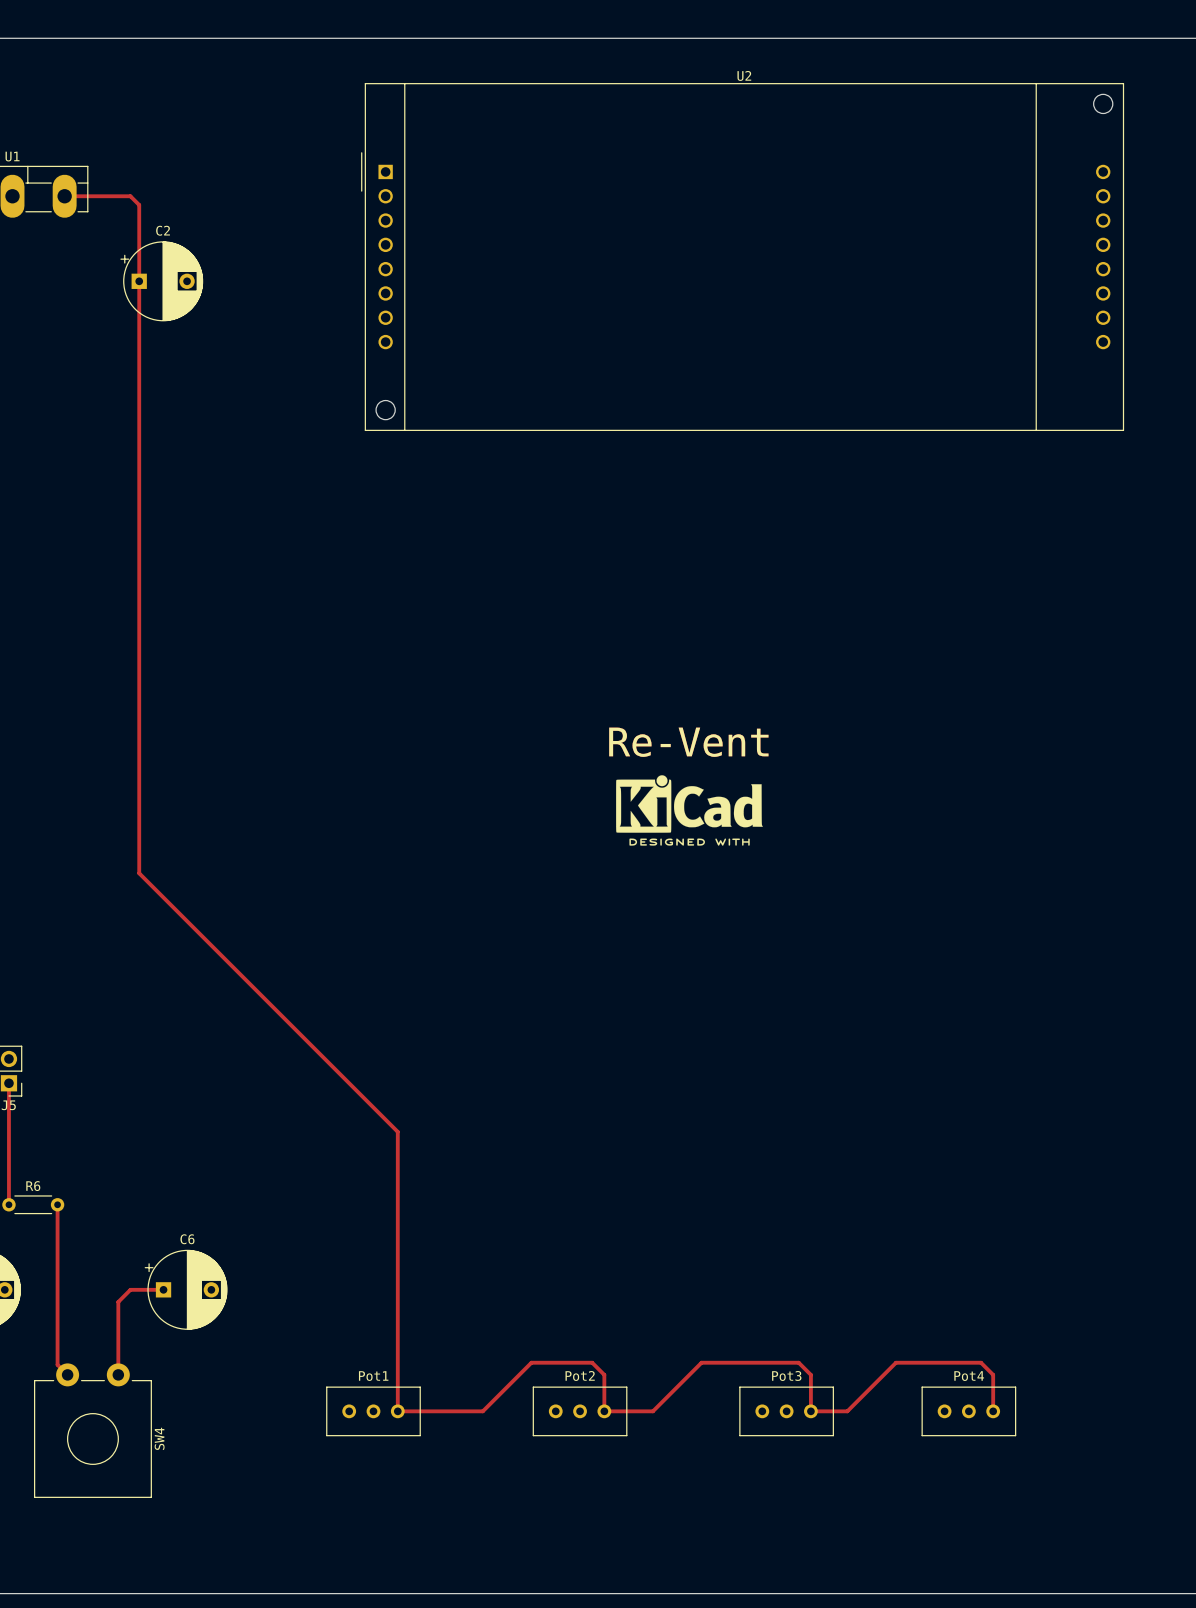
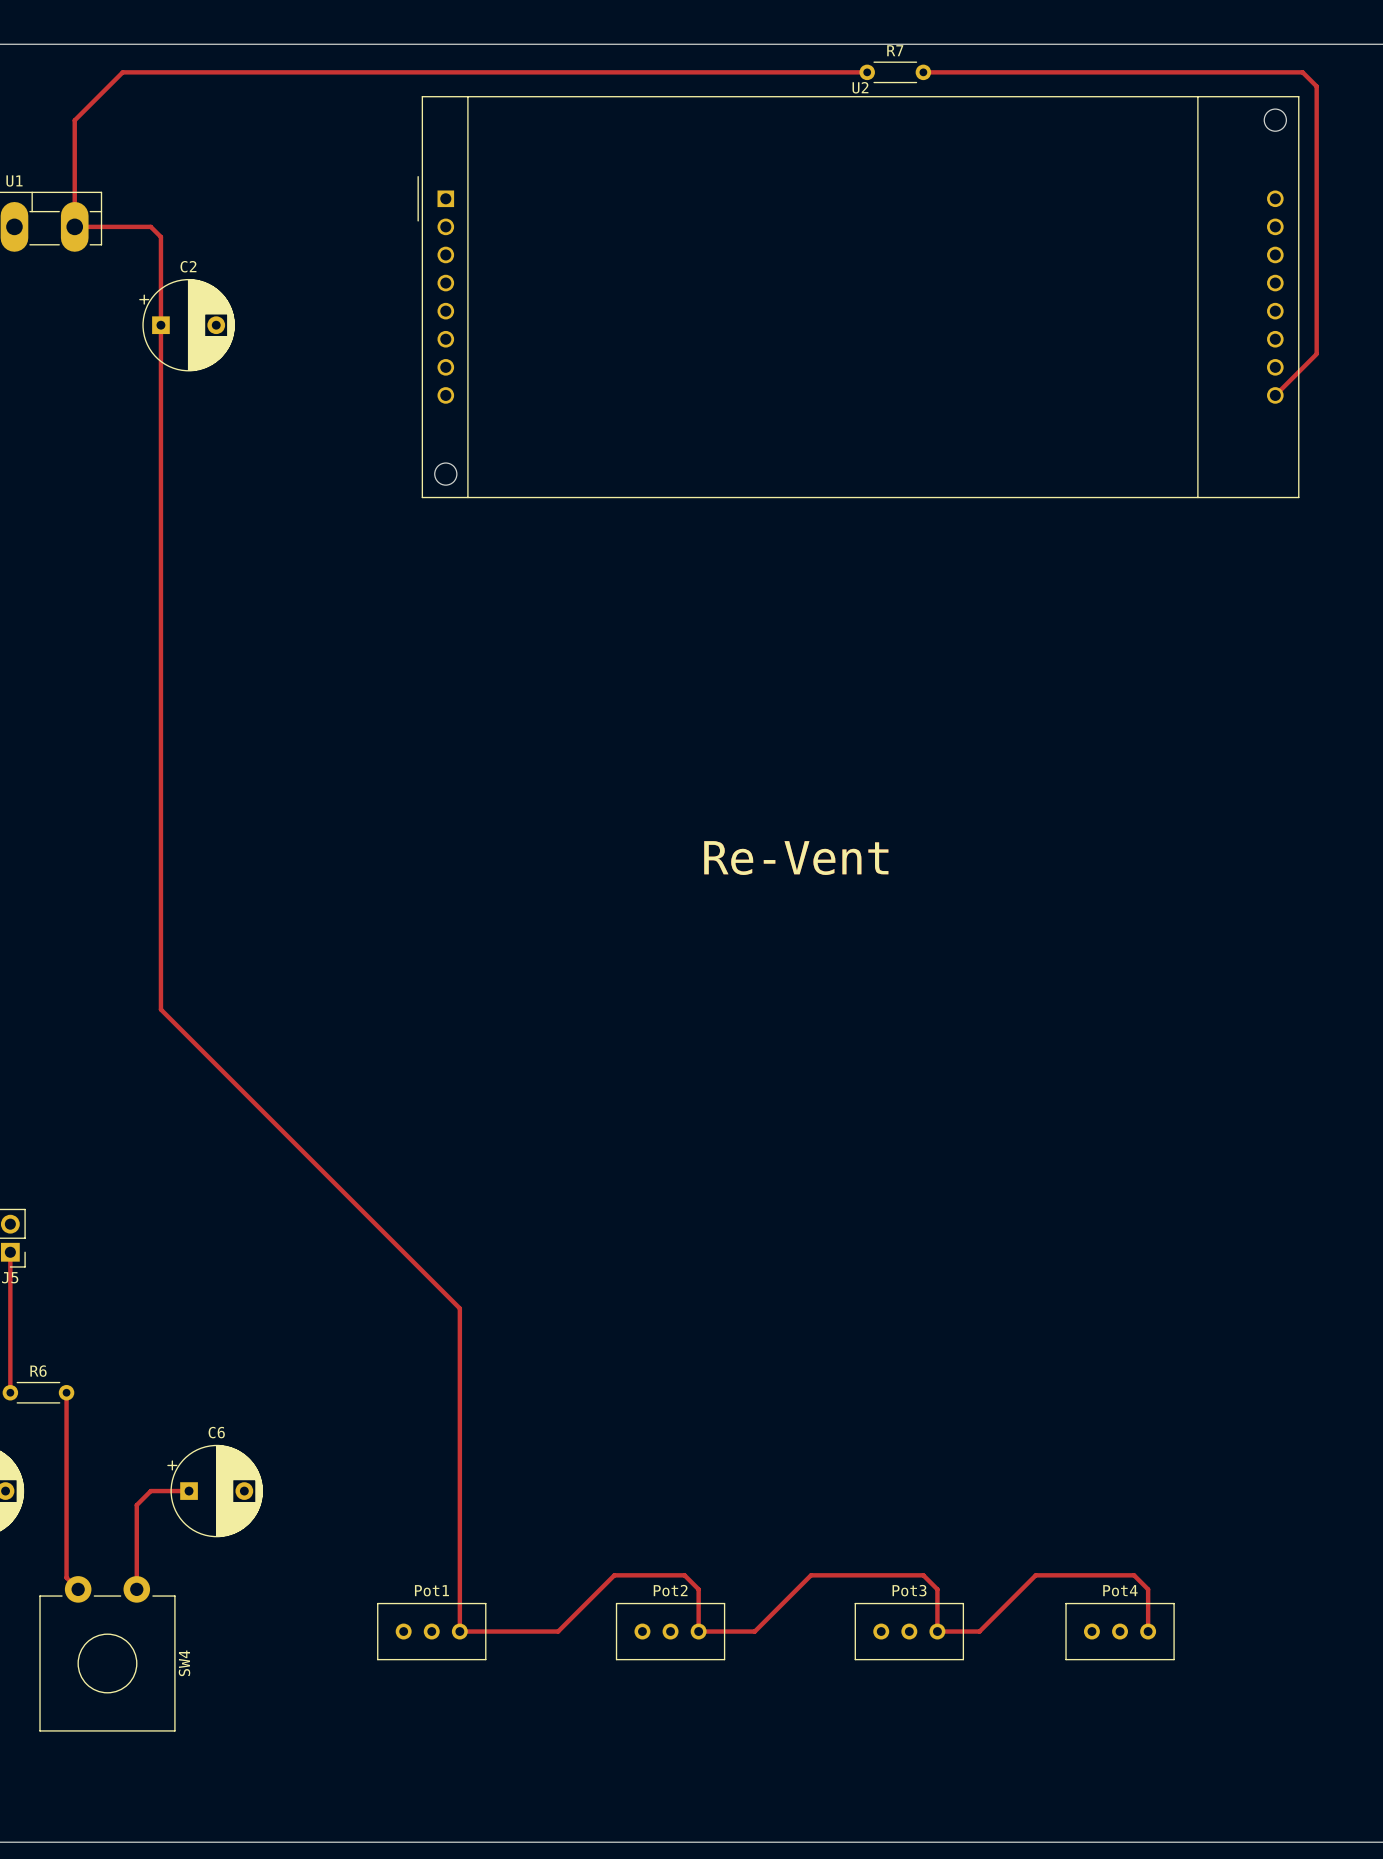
track: none -> (867, 72) (122, 72) (74, 120) (74, 226)
R7: none -> (895, 72)
track: none -> (923, 72) (1302, 72) (1316, 86) (1316, 353)
track: none -> (1316, 354) (1275, 395)
drawing: [616, 775, 763, 846] -> none

